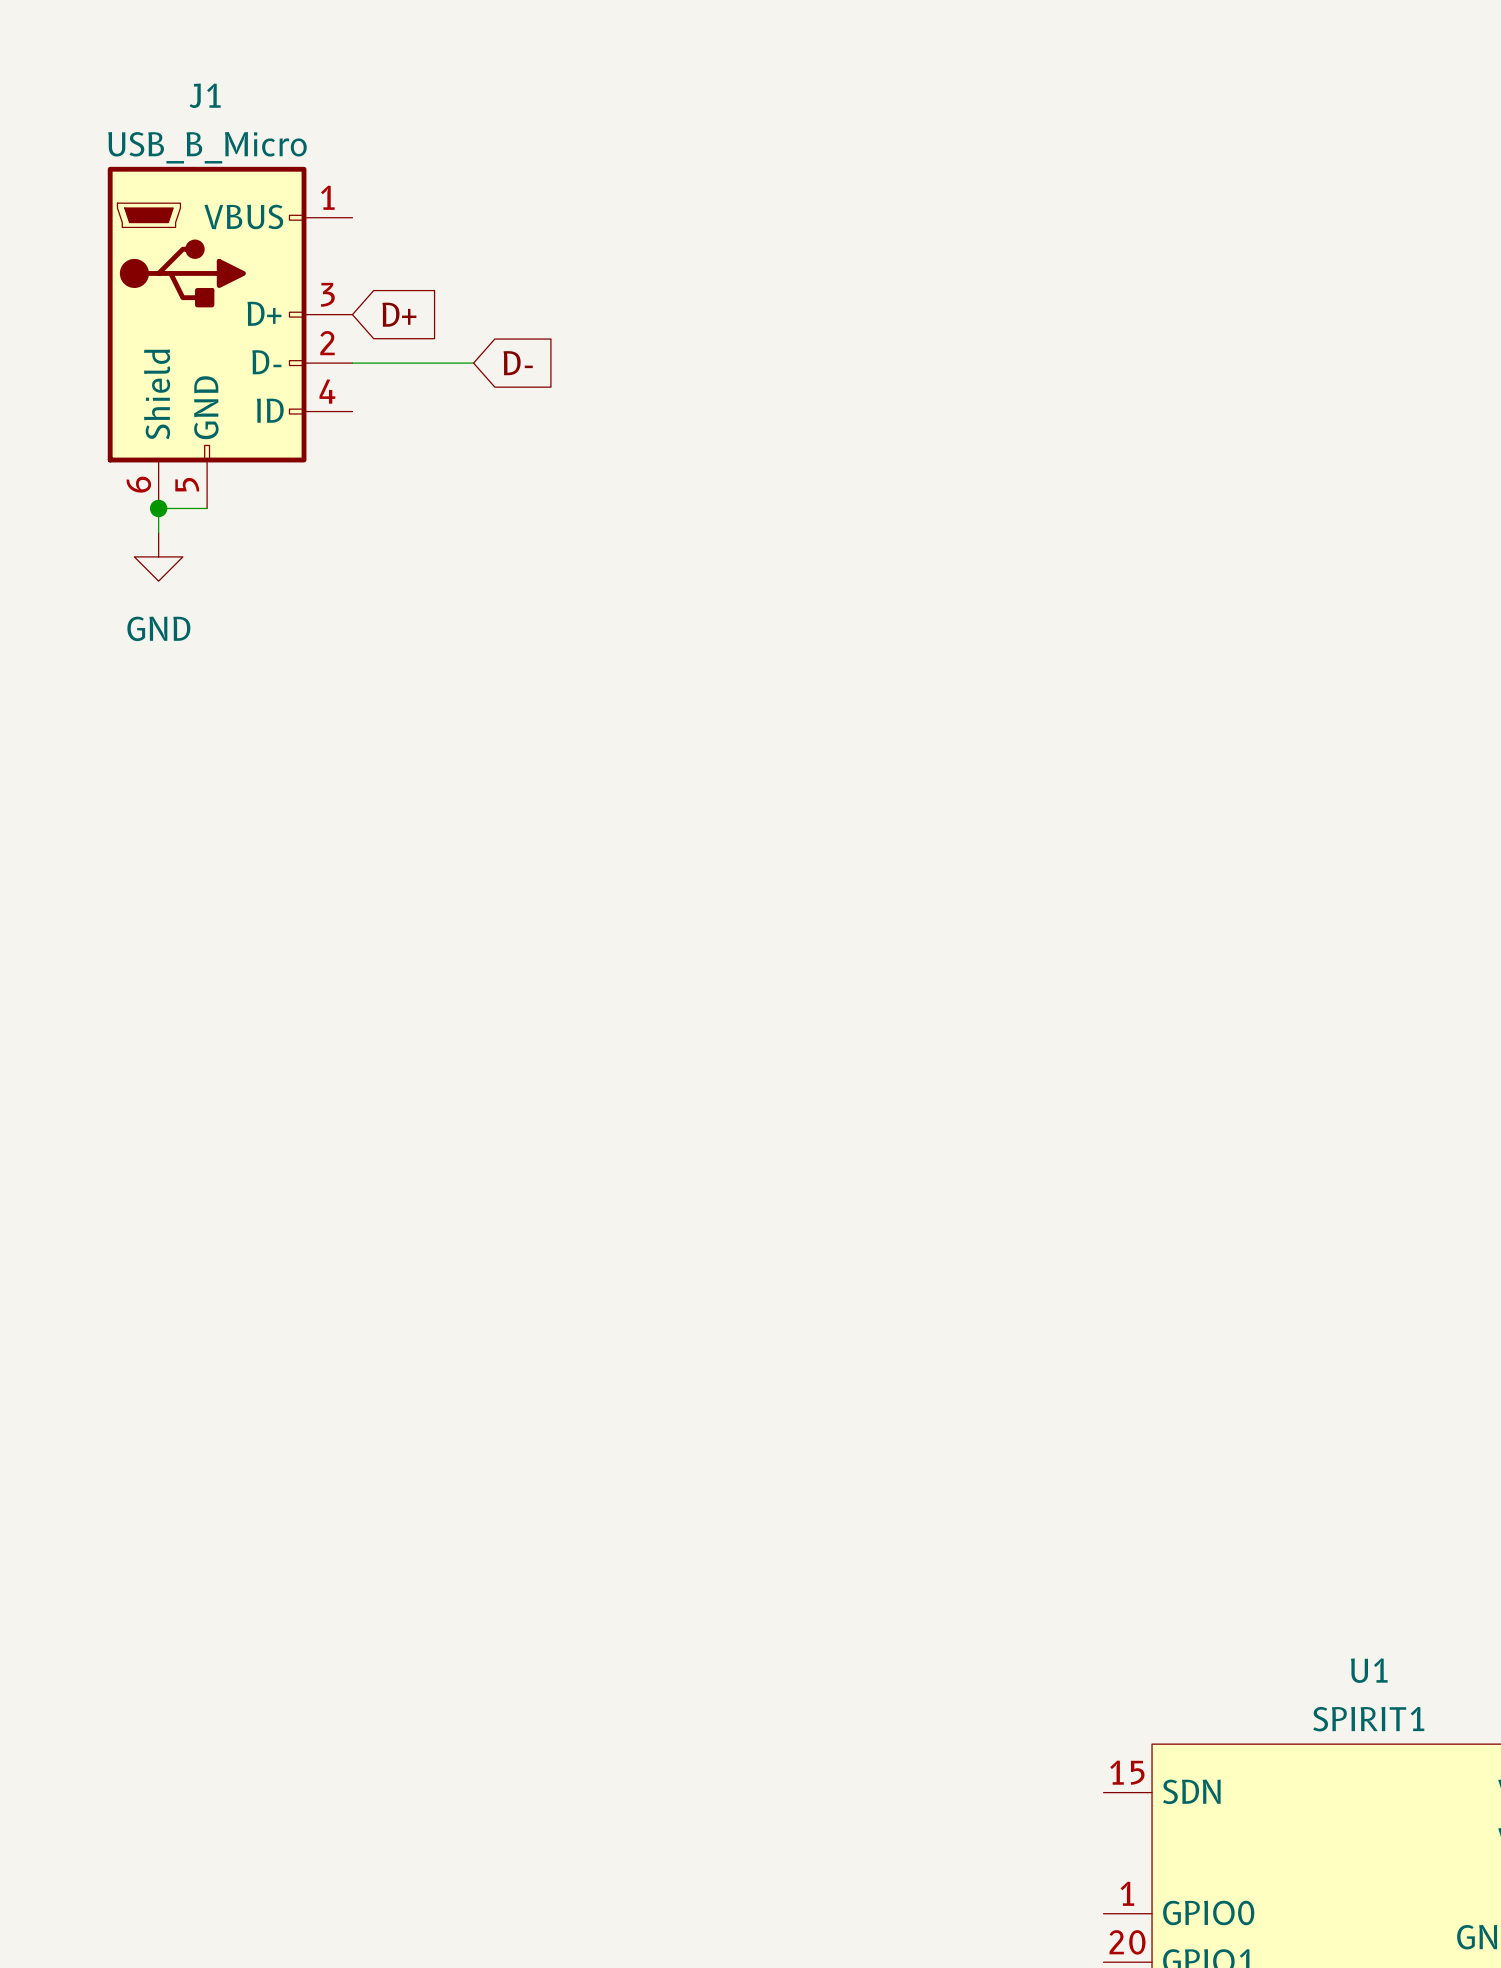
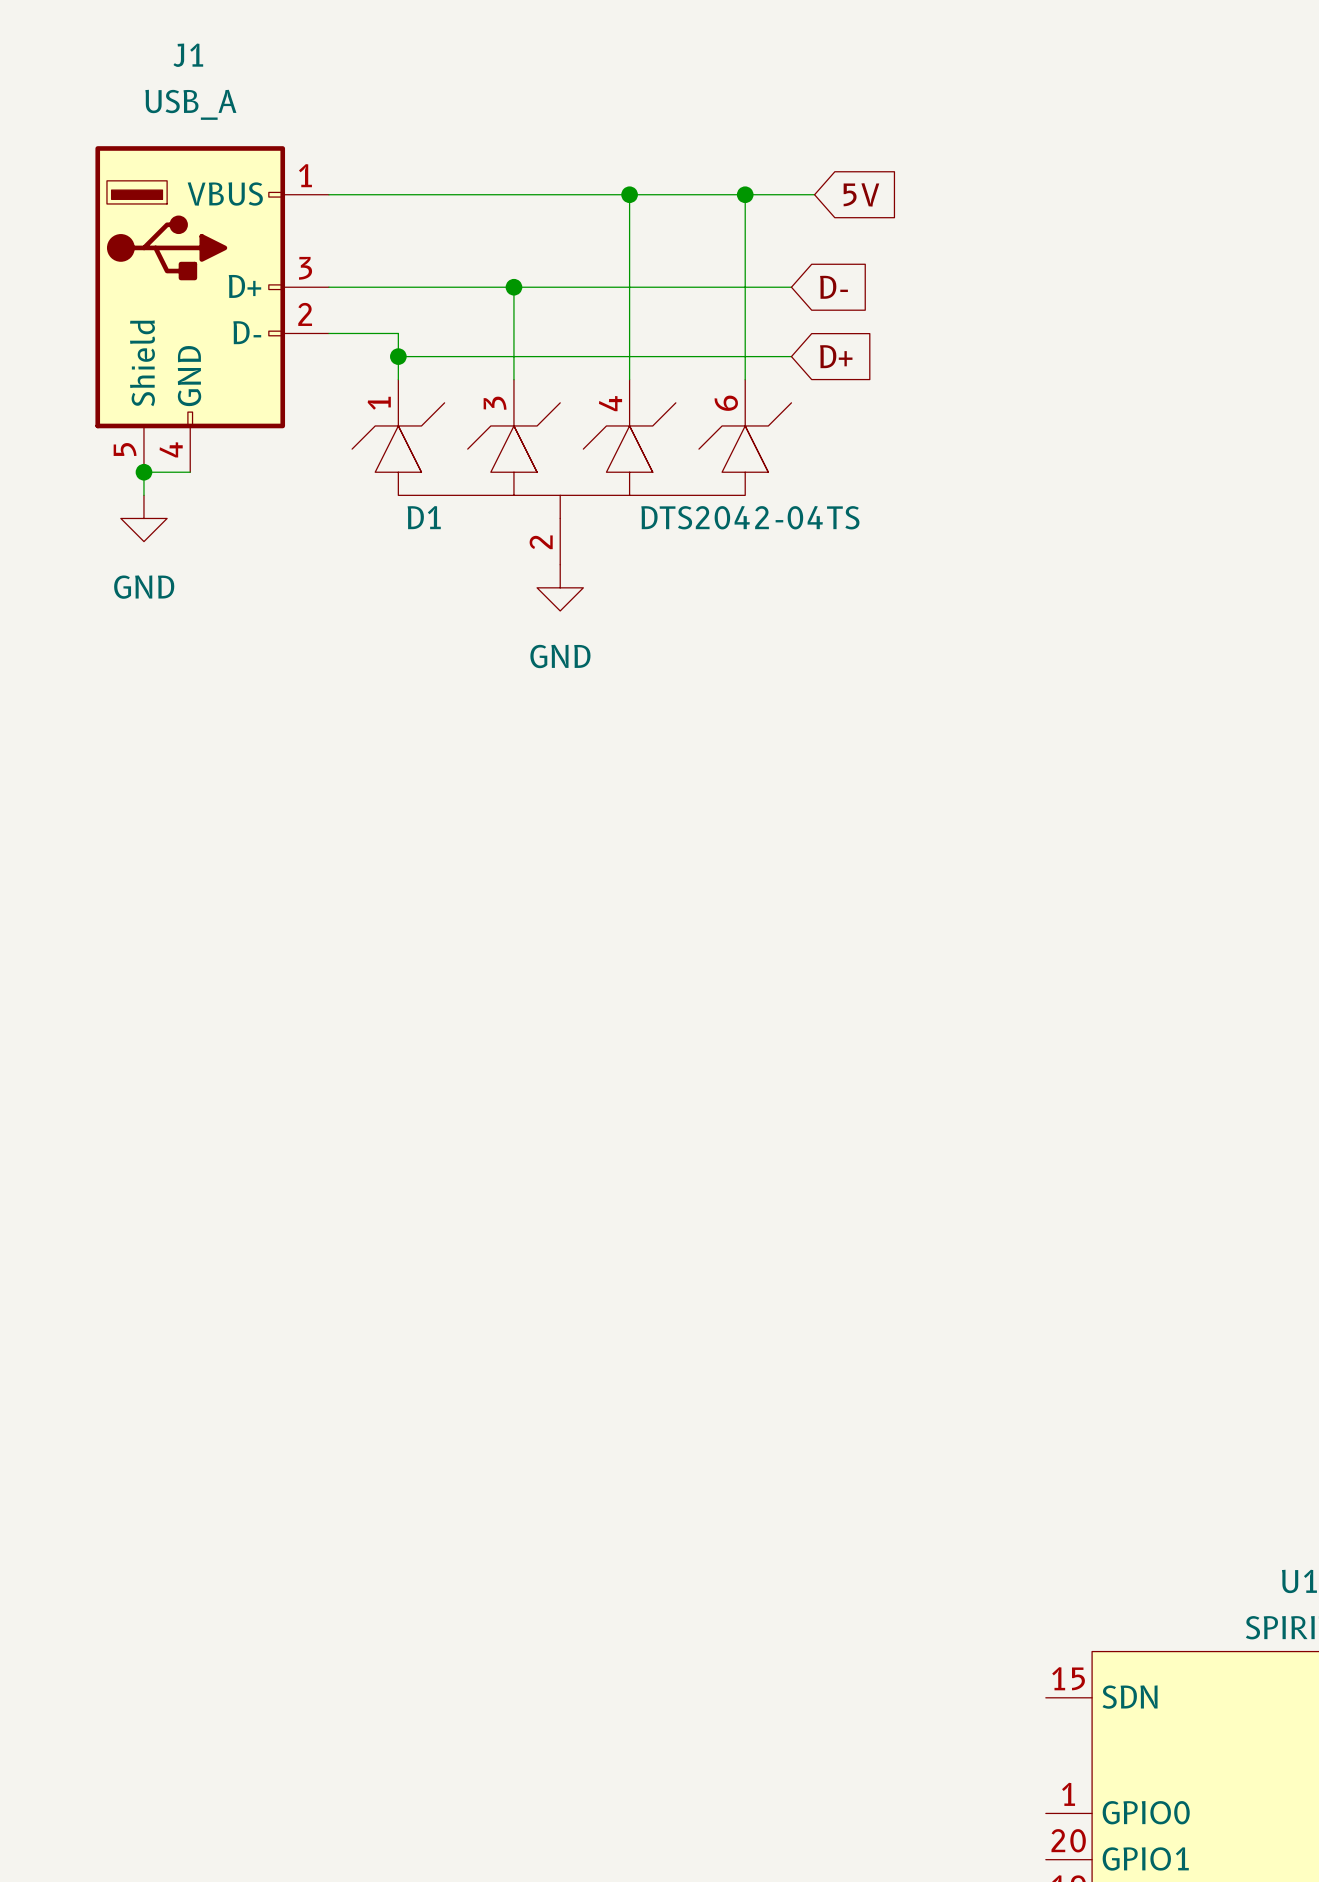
J1 value: USB_B_Micro (207, 147) -> USB_A (190, 104)
J1 symbol: [107, 166, 353, 509] -> [95, 146, 329, 473]
wire: none -> (328, 194) (814, 194)
wire: none -> (629, 194) (629, 379)
junction: none -> (629, 194)
wire: none -> (745, 194) (745, 379)
junction: none -> (745, 194)
global label: none -> 5V (861, 194)
wire: none -> (328, 287) (791, 287)
global label: D+ (399, 314) -> none
wire: none -> (513, 287) (513, 379)
junction: none -> (513, 287)
wire: (425, 363) (473, 363) -> (398, 333) (398, 379)
global label position: D- (518, 363) -> D- (833, 287)
wire: none -> (398, 356) (791, 356)
junction: none -> (398, 356)
global label: none -> D+ (836, 356)
D1: none -> DTS2042-04TS (571, 472)
power symbol: none -> GND (560, 587)

